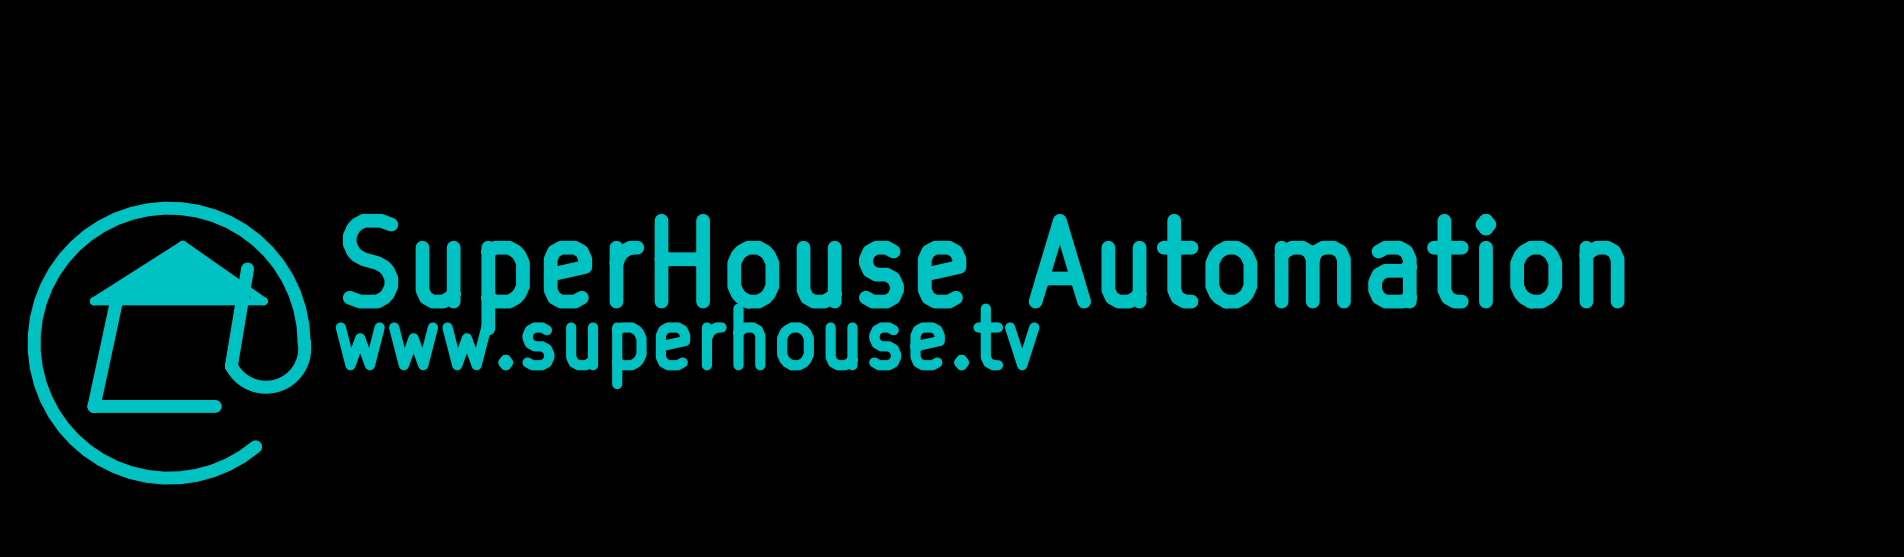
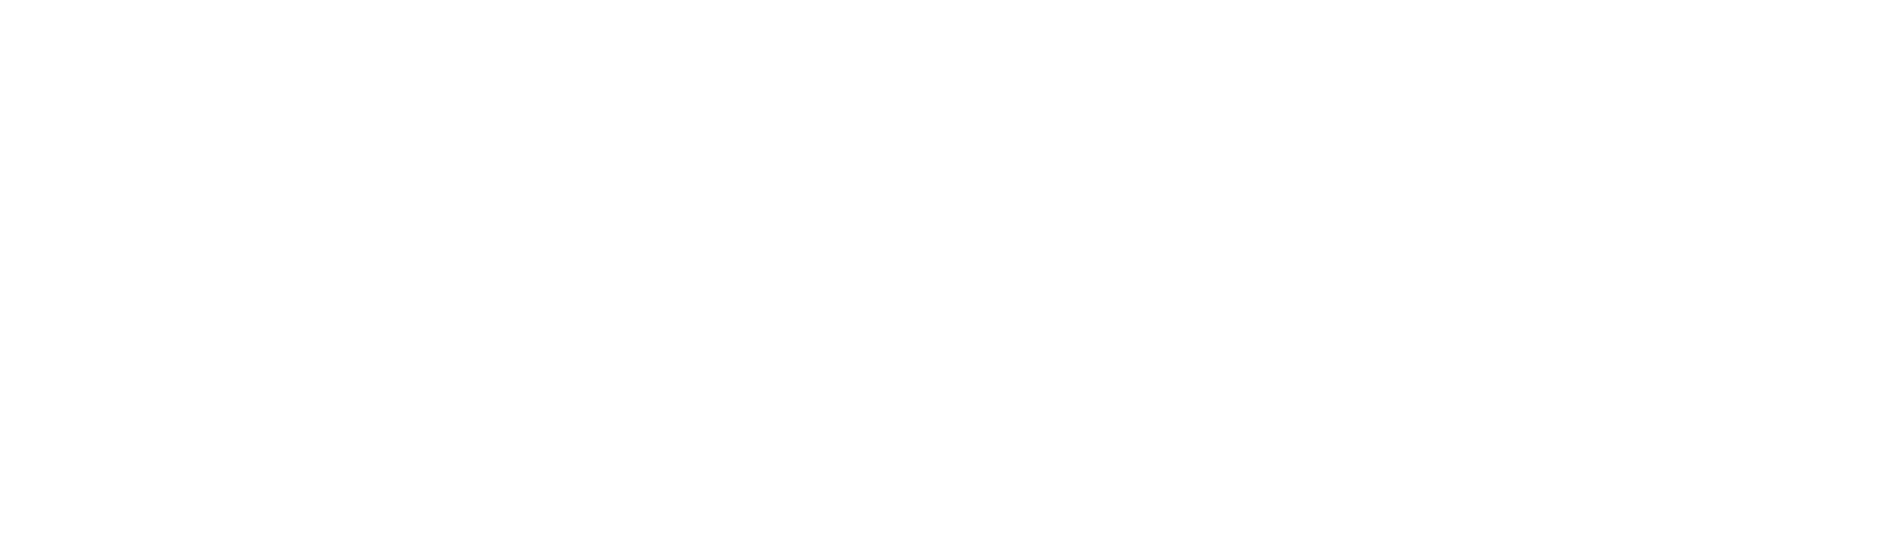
line: (182, 244) (93, 301) (263, 301) (182, 244) -> none
line: (182, 268) (166, 277) (207, 277) (182, 260) (134, 285) (223, 285) -> none
line: (247, 268) (231, 365) (240, 377) (253, 385) (263, 387) (278, 385) (294, 374) (300, 366) (304, 351) (299, 308) (287, 278) (268, 251) (242, 230) (213, 215) (180, 208) (164, 208) (131, 213) (101, 226) (75, 246) (63, 258) (46, 286) (36, 318) (34, 351) (40, 383) (46, 398) (63, 427) (86, 450) (115, 467) (131, 472) (163, 478) (196, 475) (227, 464) (255, 446) -> none
text: SuperHouse Automation (983, 274) -> none
line: (110, 293) (239, 293) (182, 252) (118, 293) (93, 406) (215, 406) -> none
text: www.superhouse.tv (687, 346) -> none

